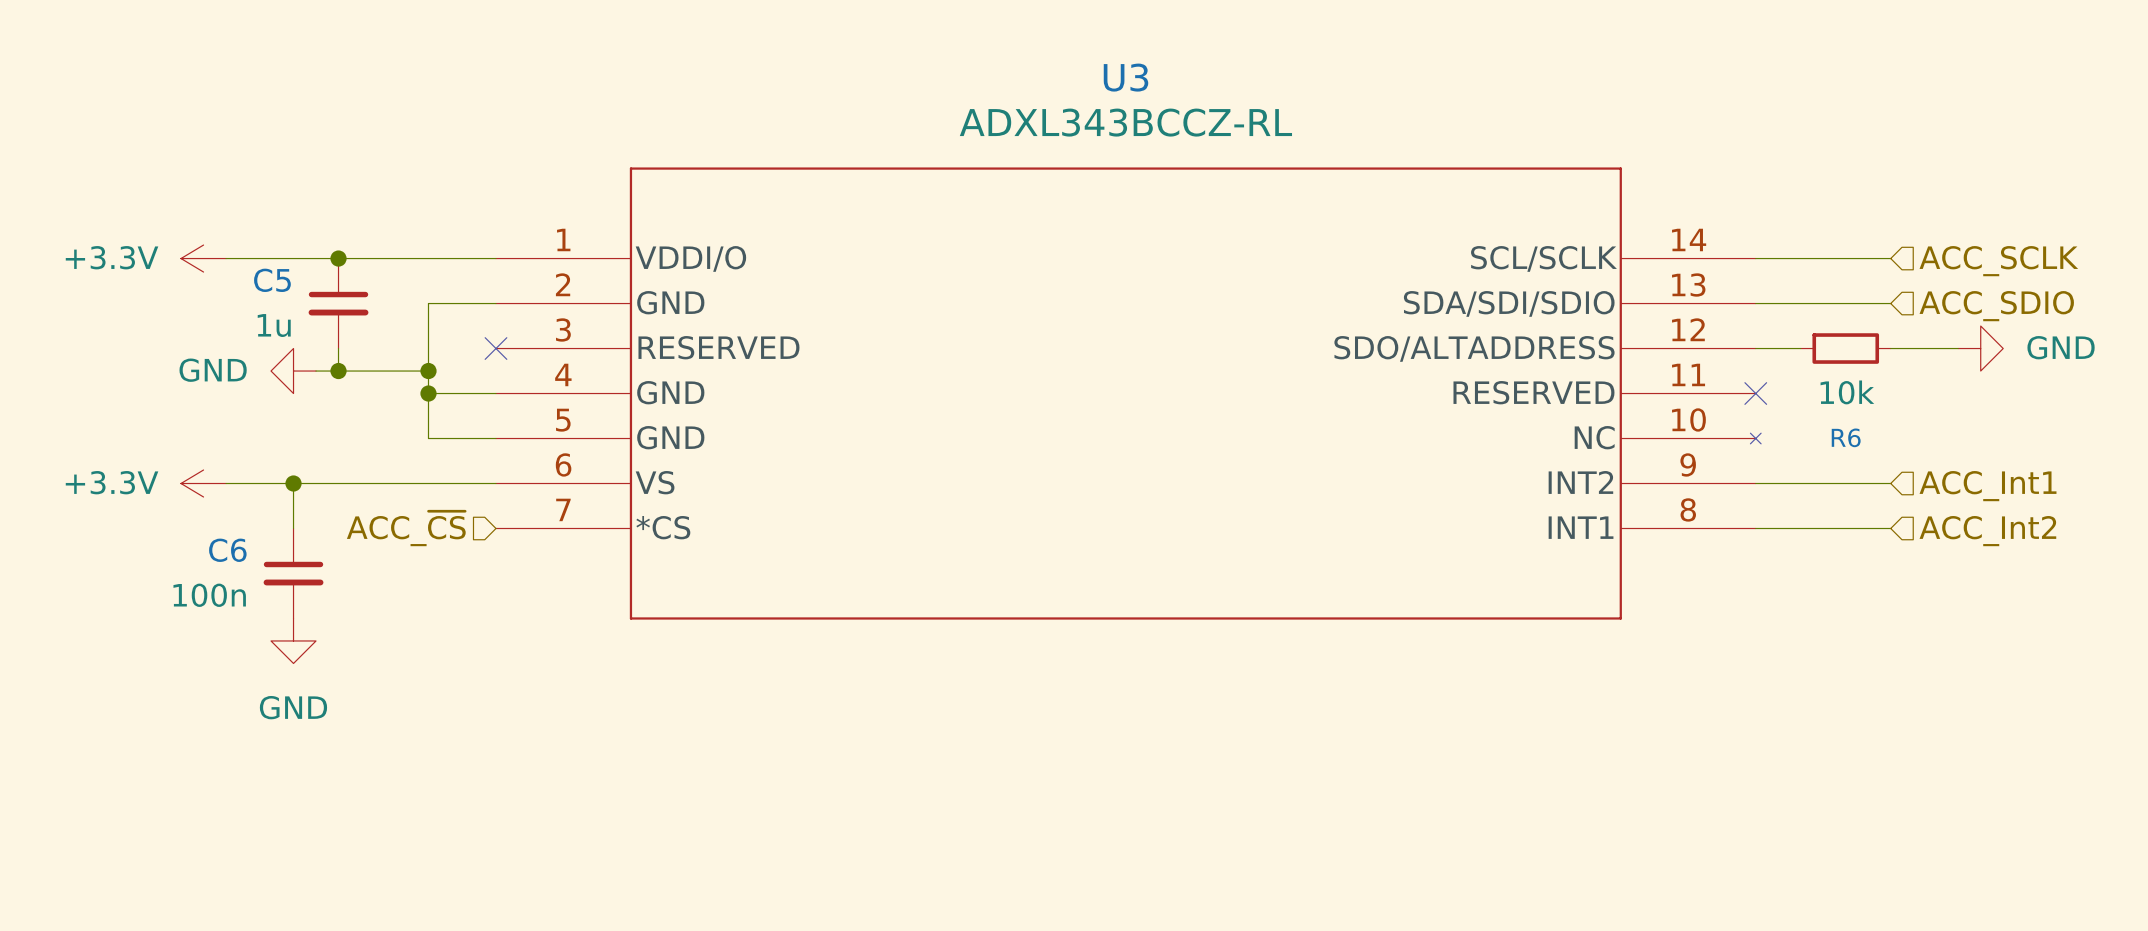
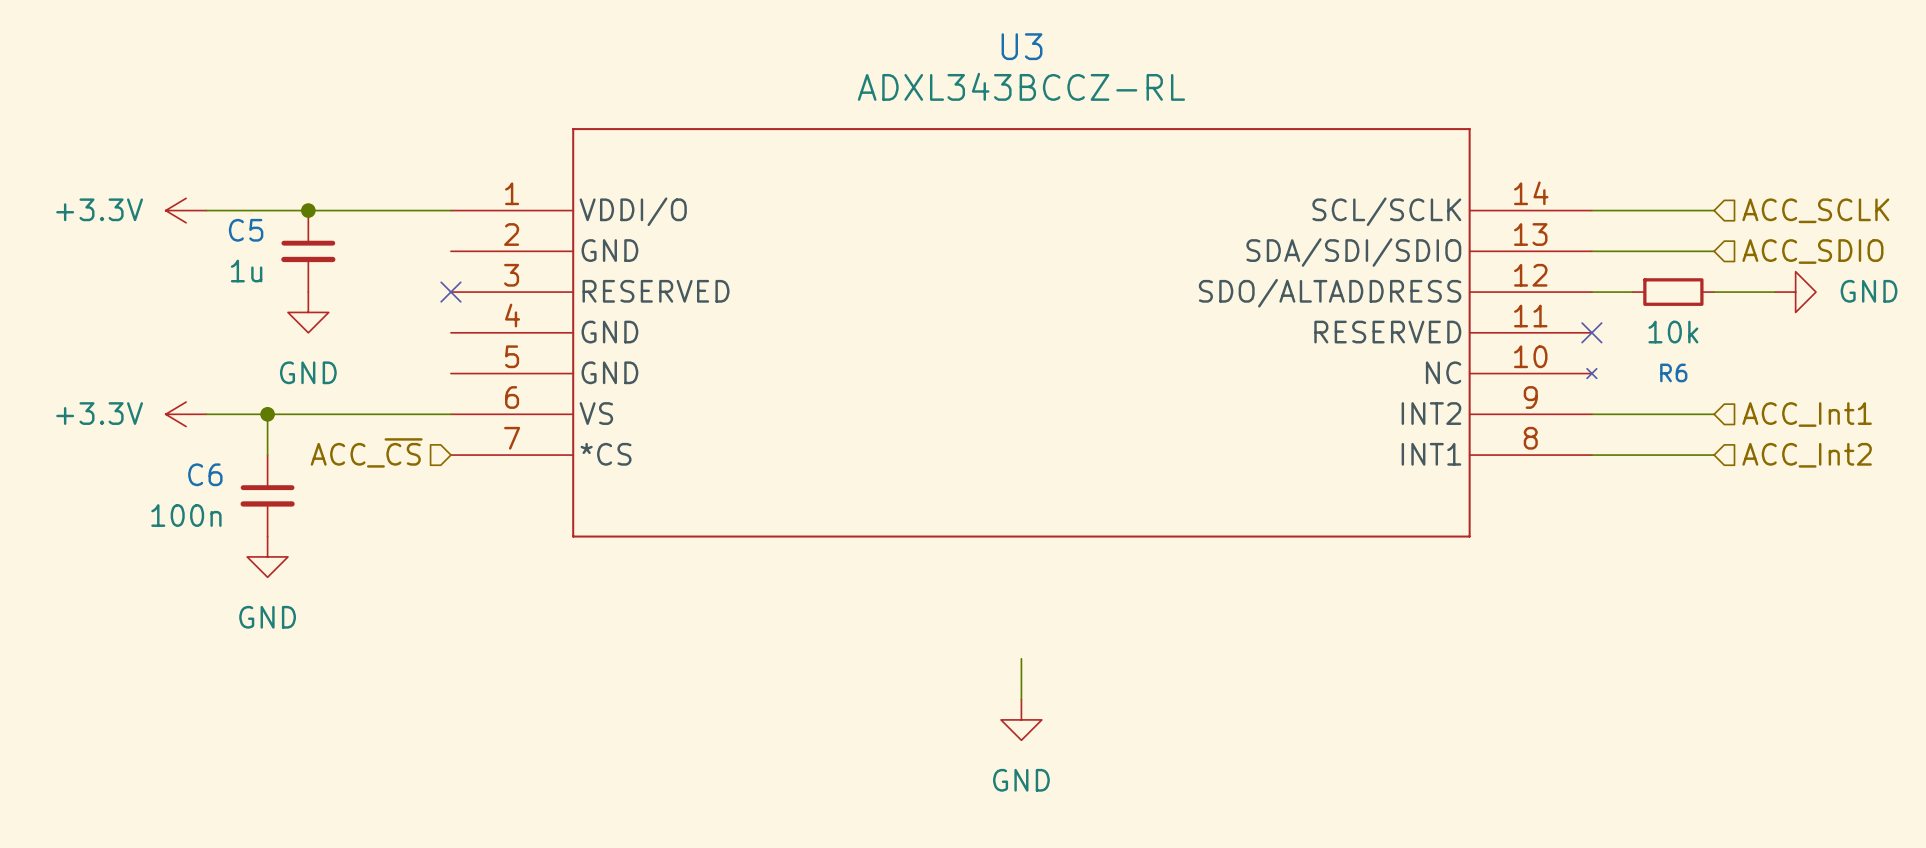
wire: (495, 303) (428, 303) (428, 438) (495, 438) -> none
power symbol rotation: 0° (293, 371) -> 90° counterclockwise (308, 312)
power symbol position: GND (293, 371) -> GND (308, 312)
wire: (316, 371) (428, 371) -> none
junction: (338, 371) -> none
junction: (428, 371) -> none
wire: (428, 393) (495, 393) -> none
junction: (428, 393) -> none
wire: none -> (1021, 658) (1021, 699)
power symbol: none -> GND (1021, 719)

